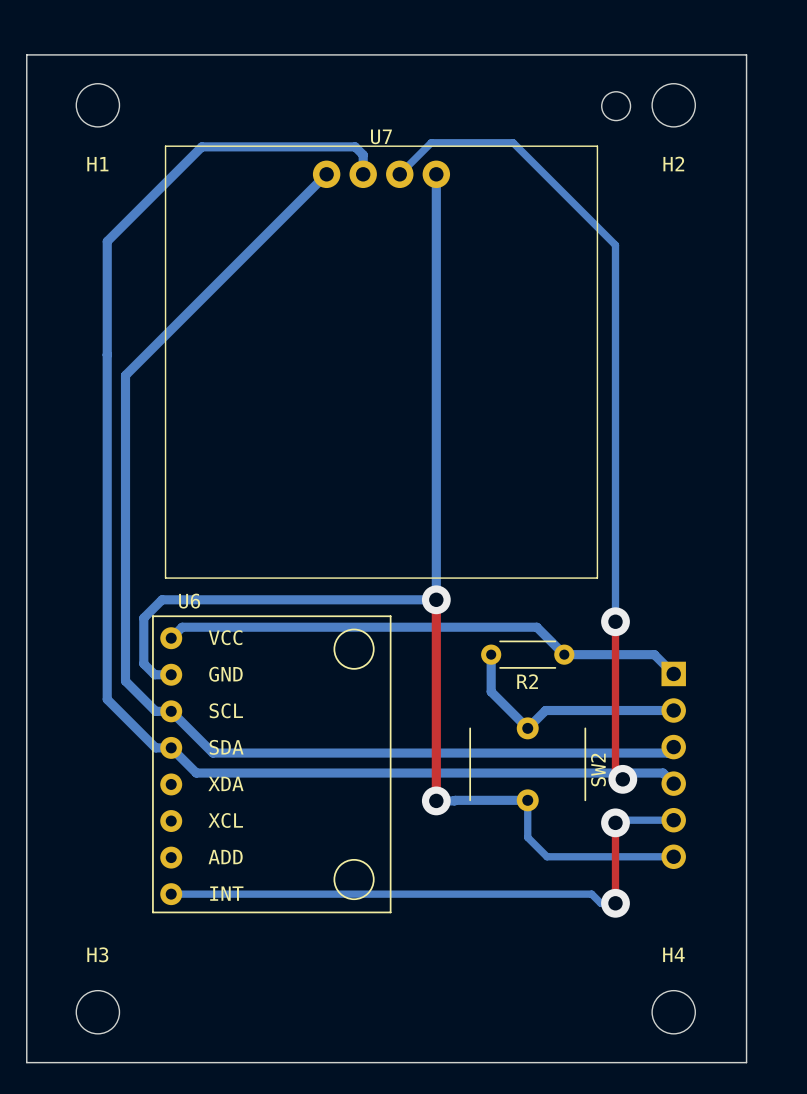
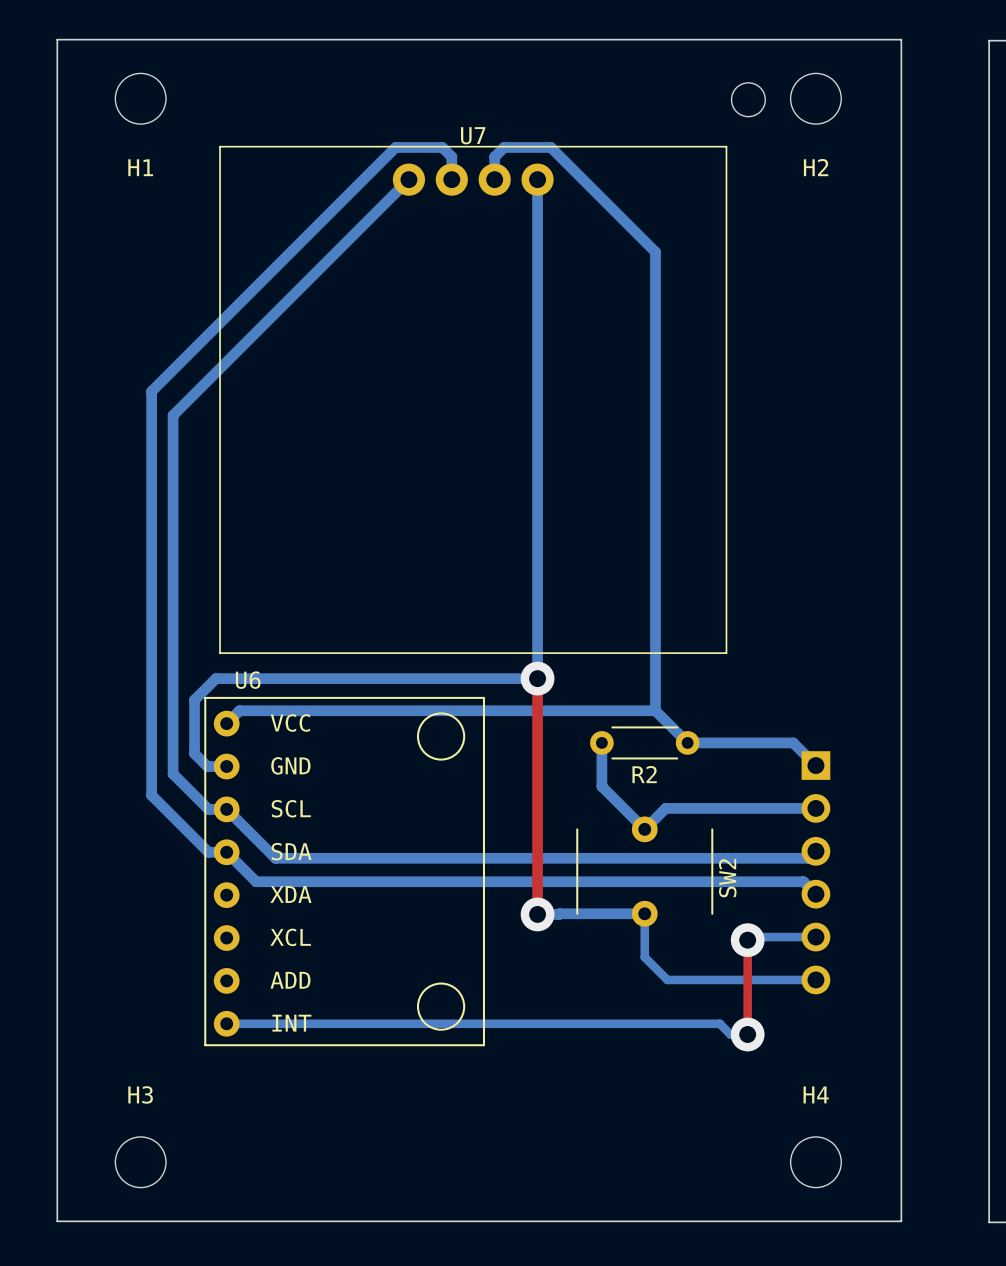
bottom track: (315, 146) (201, 146) (107, 241) (107, 354) -> (395, 147) (151, 391)
bottom track: (399, 174) (431, 142) (513, 142) (615, 245) (615, 621) -> (494, 179) (494, 156) (504, 147) (550, 147) (655, 252) (655, 710)
top track: (615, 621) (615, 772) (622, 779) -> none
via: (615, 621) -> none
via: (622, 779) -> none

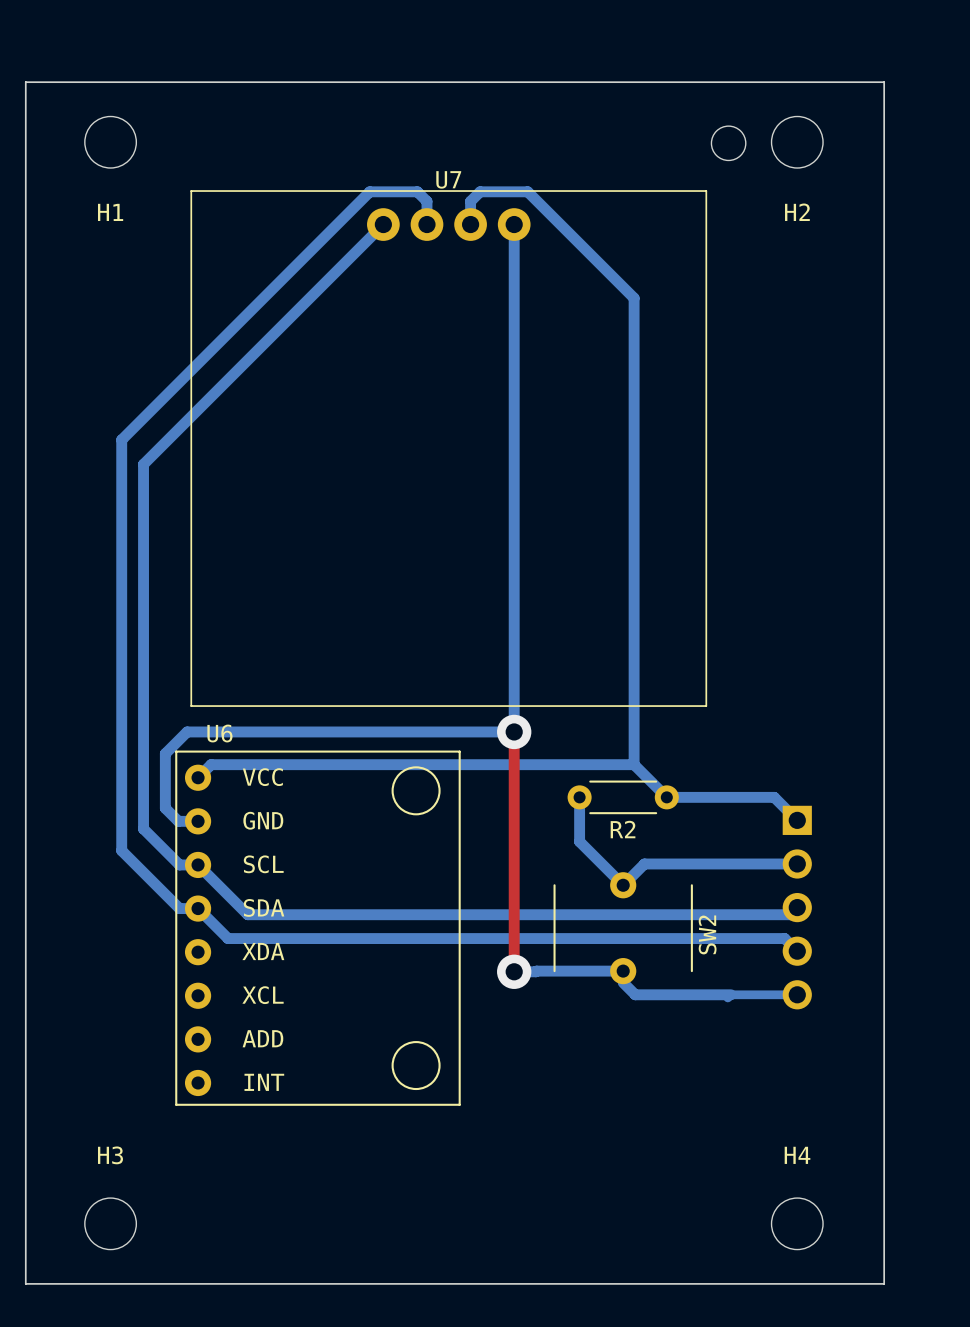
part: (815, 872) -> none
bottom track: (644, 925) (644, 957) (667, 979) (815, 979) -> (623, 982) (635, 994) (731, 994)
top track: (747, 940) (747, 1034) -> none
via: (747, 940) -> none
bottom track: (226, 1023) (719, 1023) (730, 1034) (747, 1034) -> none
via: (747, 1034) -> none

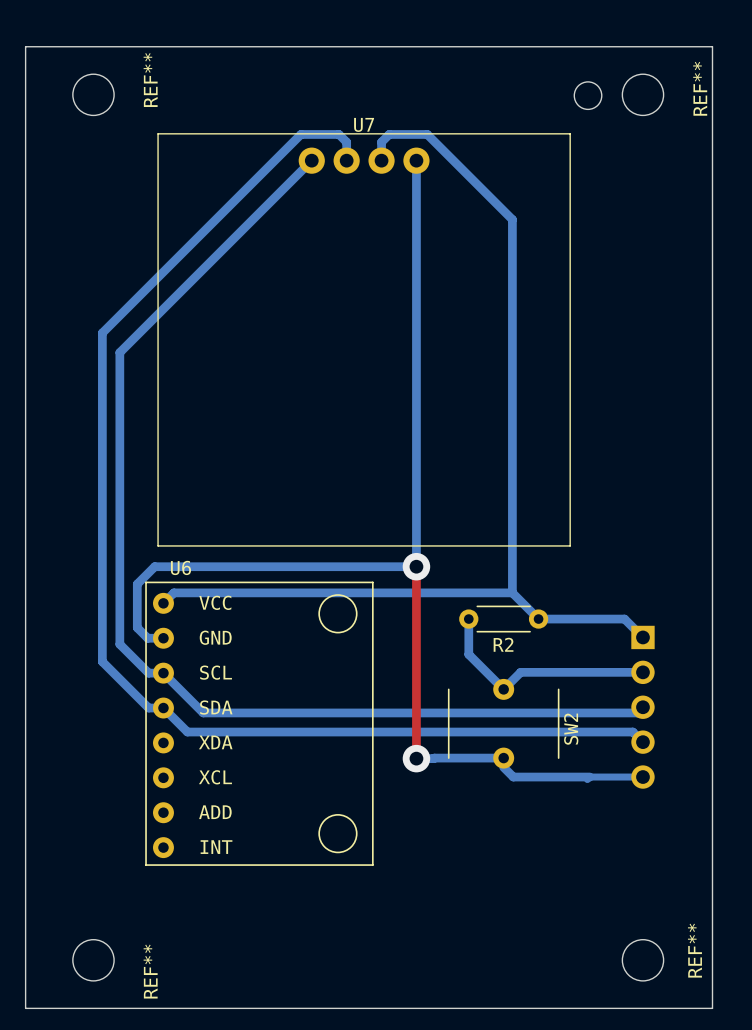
H1 name: H1 (110, 212) -> REF** (150, 80)
H2 name: H2 (797, 212) -> REF** (700, 88)
H3 name: H3 (110, 1155) -> REF** (150, 971)
H4 name: H4 (797, 1155) -> REF** (694, 950)

